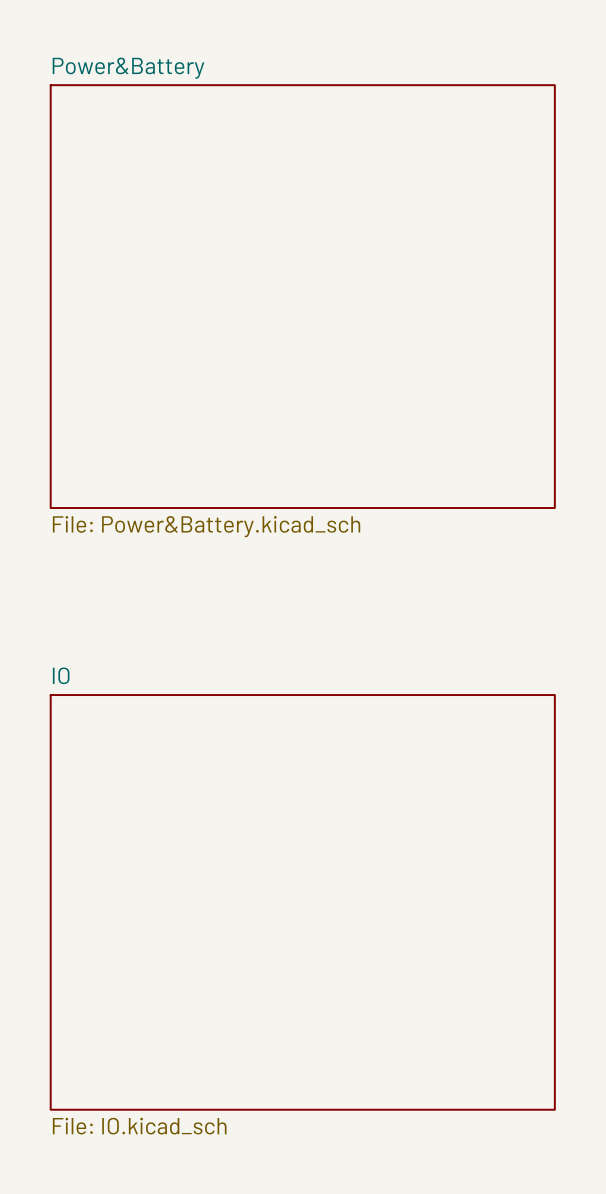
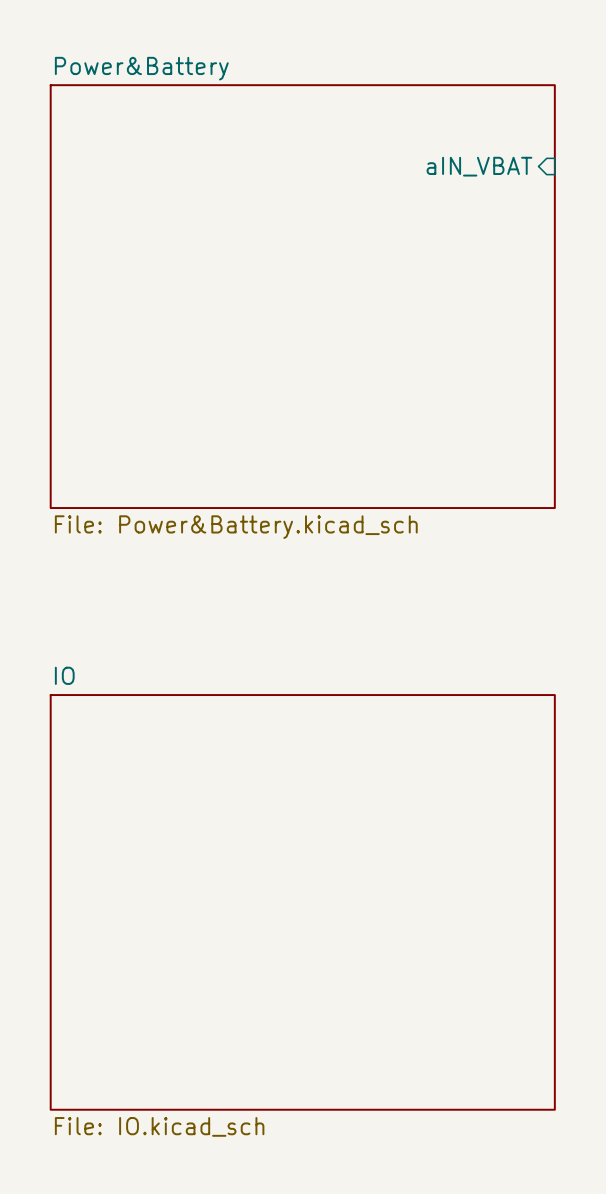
sheet pin: none -> aIN_VBAT (479, 166)

